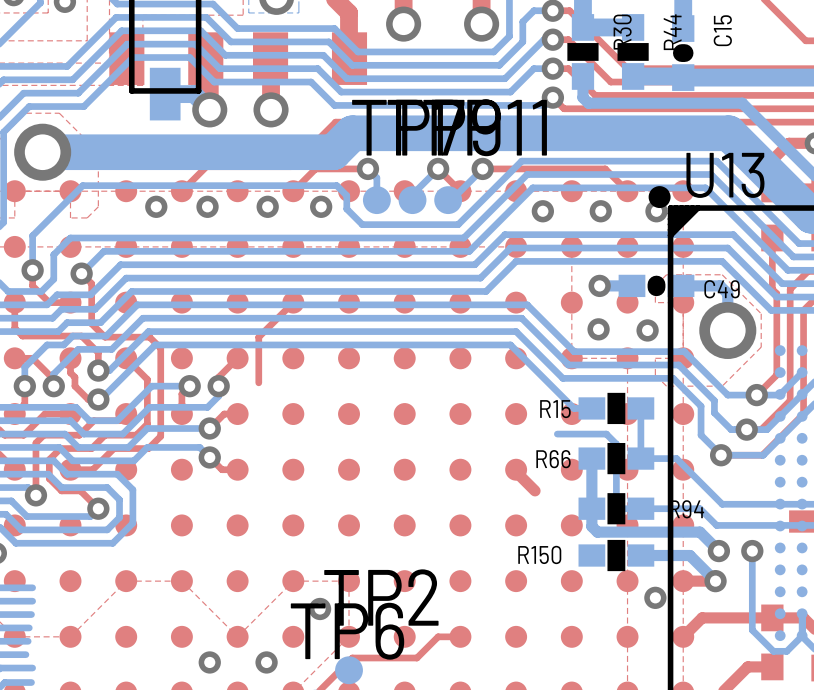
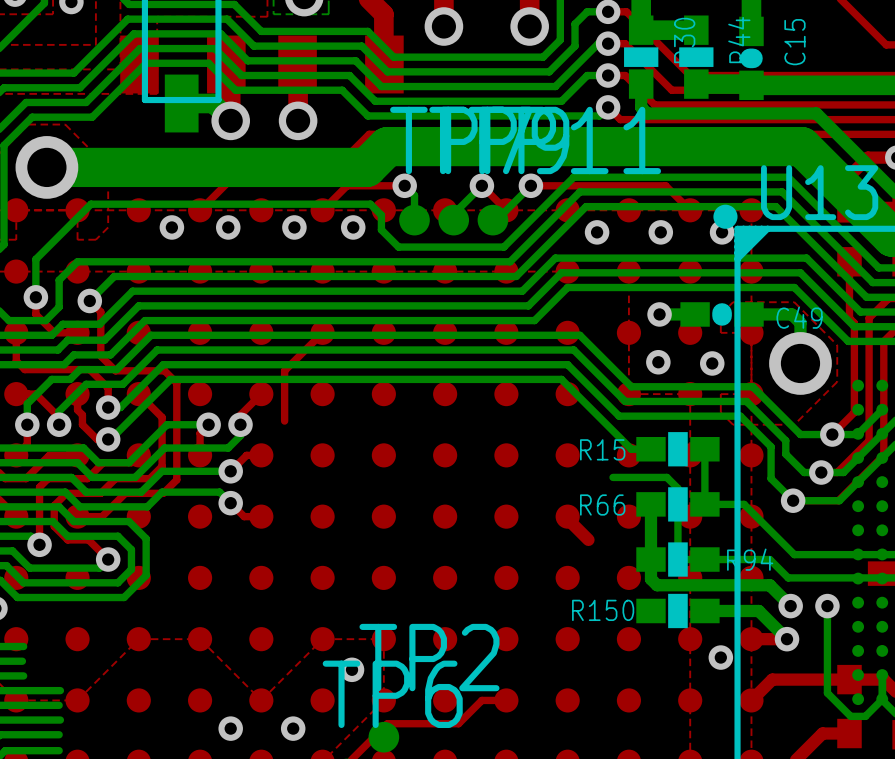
bottom track: (32, 587) (21, 587) -> none
bottom track: (32, 601) (20, 601) -> none
bottom track: (31, 614) (21, 614) -> none
bottom track: none -> (60, 690) (32, 690)
bottom track: none -> (59, 705) (30, 705)
bottom track: none -> (60, 720) (28, 720)
bottom track: none -> (59, 734) (35, 734)
bottom track: none -> (59, 750) (34, 750)

